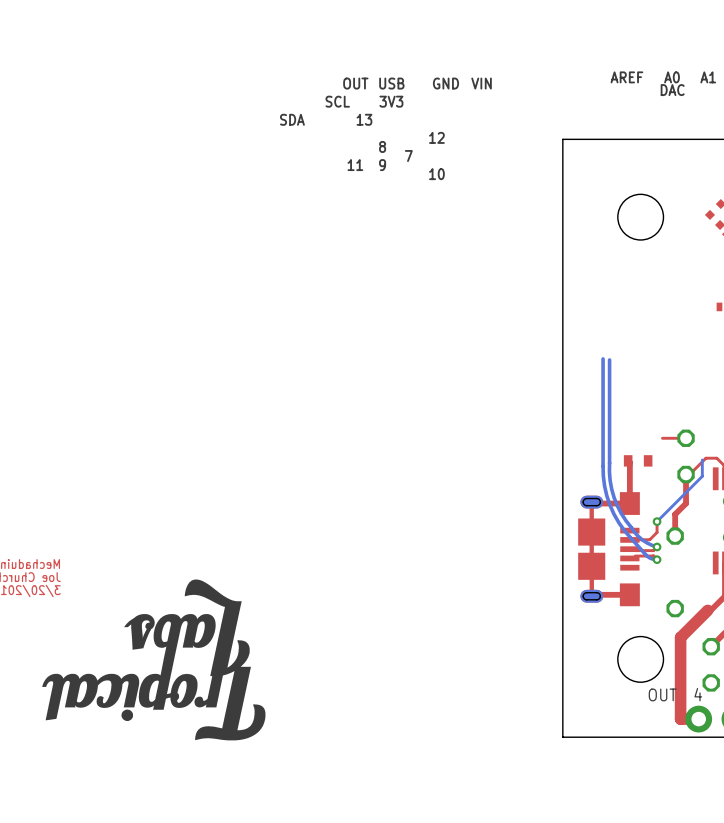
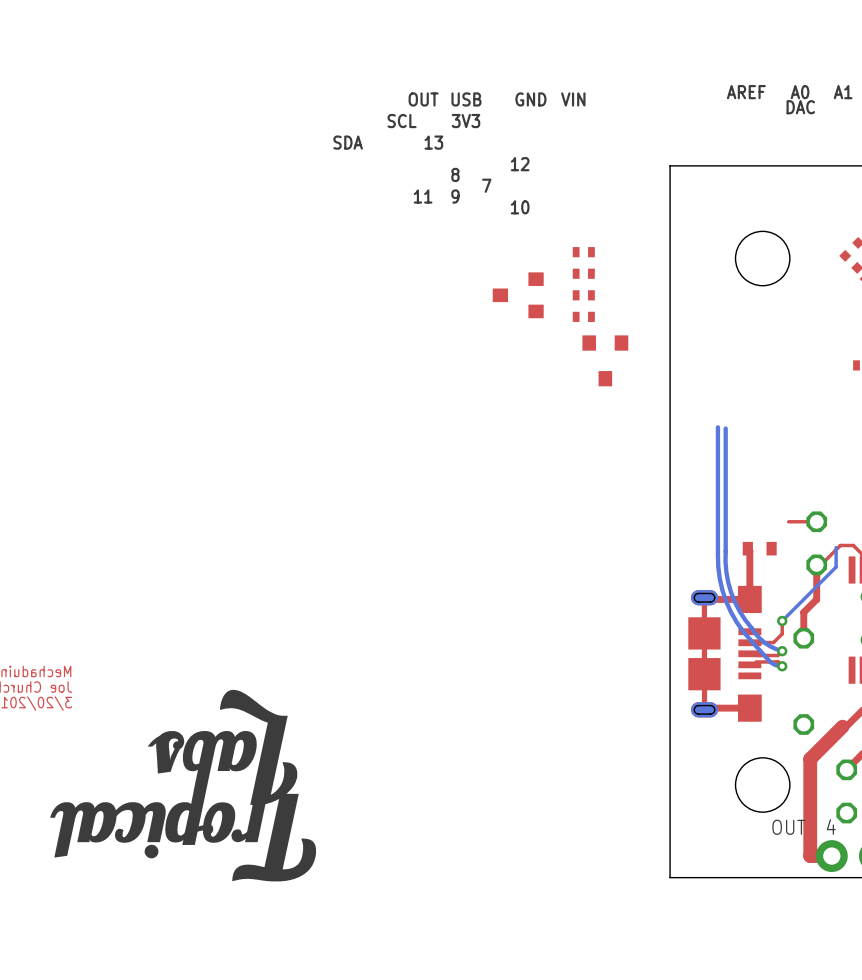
part: none -> (583, 252)
part: none -> (583, 273)
part: none -> (518, 295)
part: none -> (583, 295)
part: none -> (583, 316)
part: none -> (605, 360)

